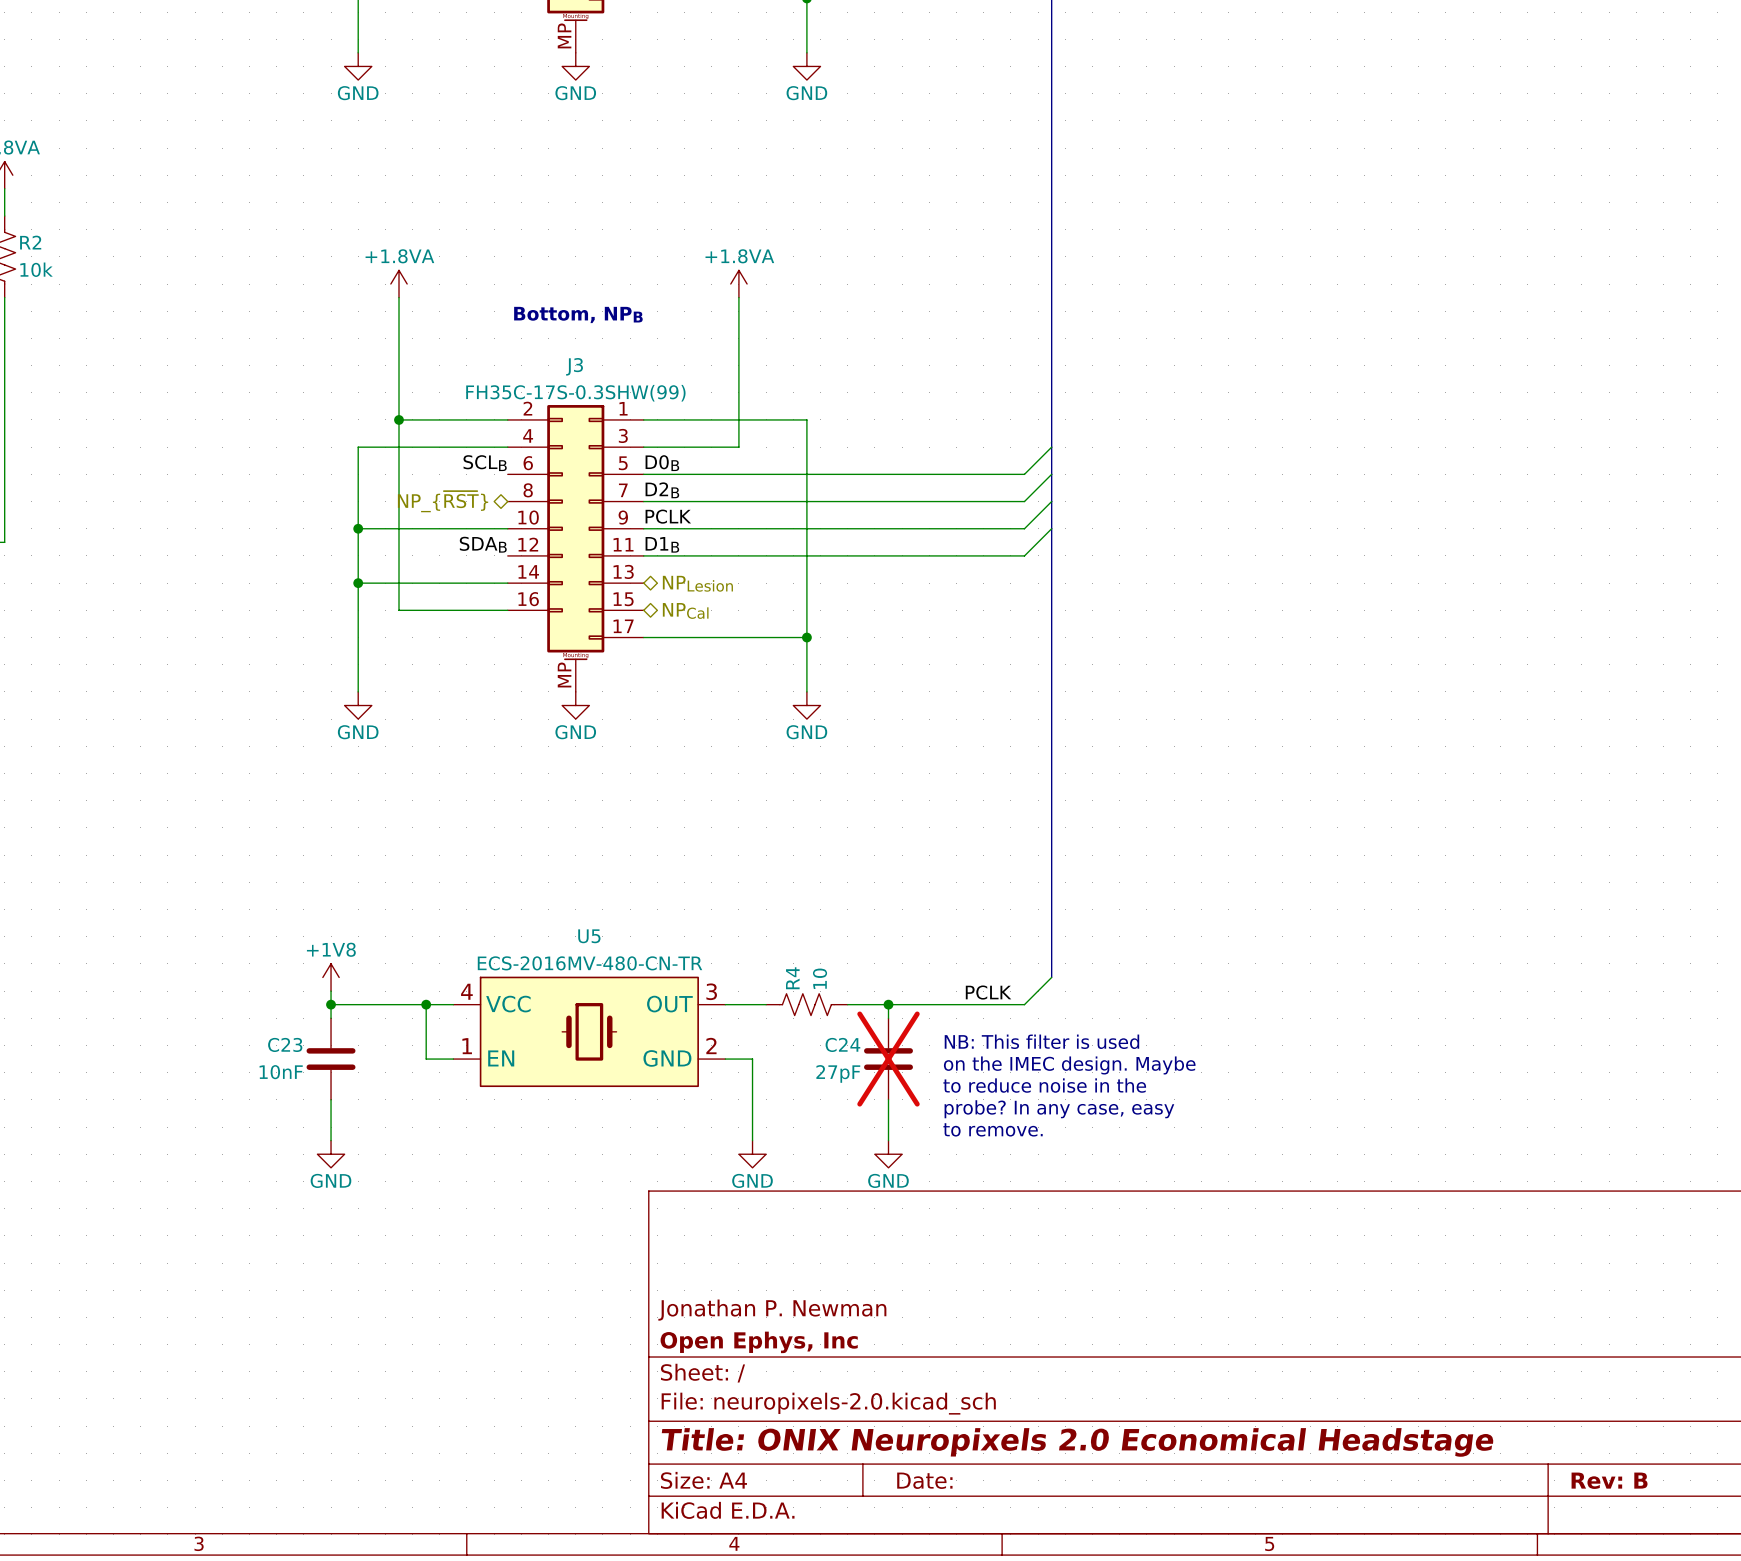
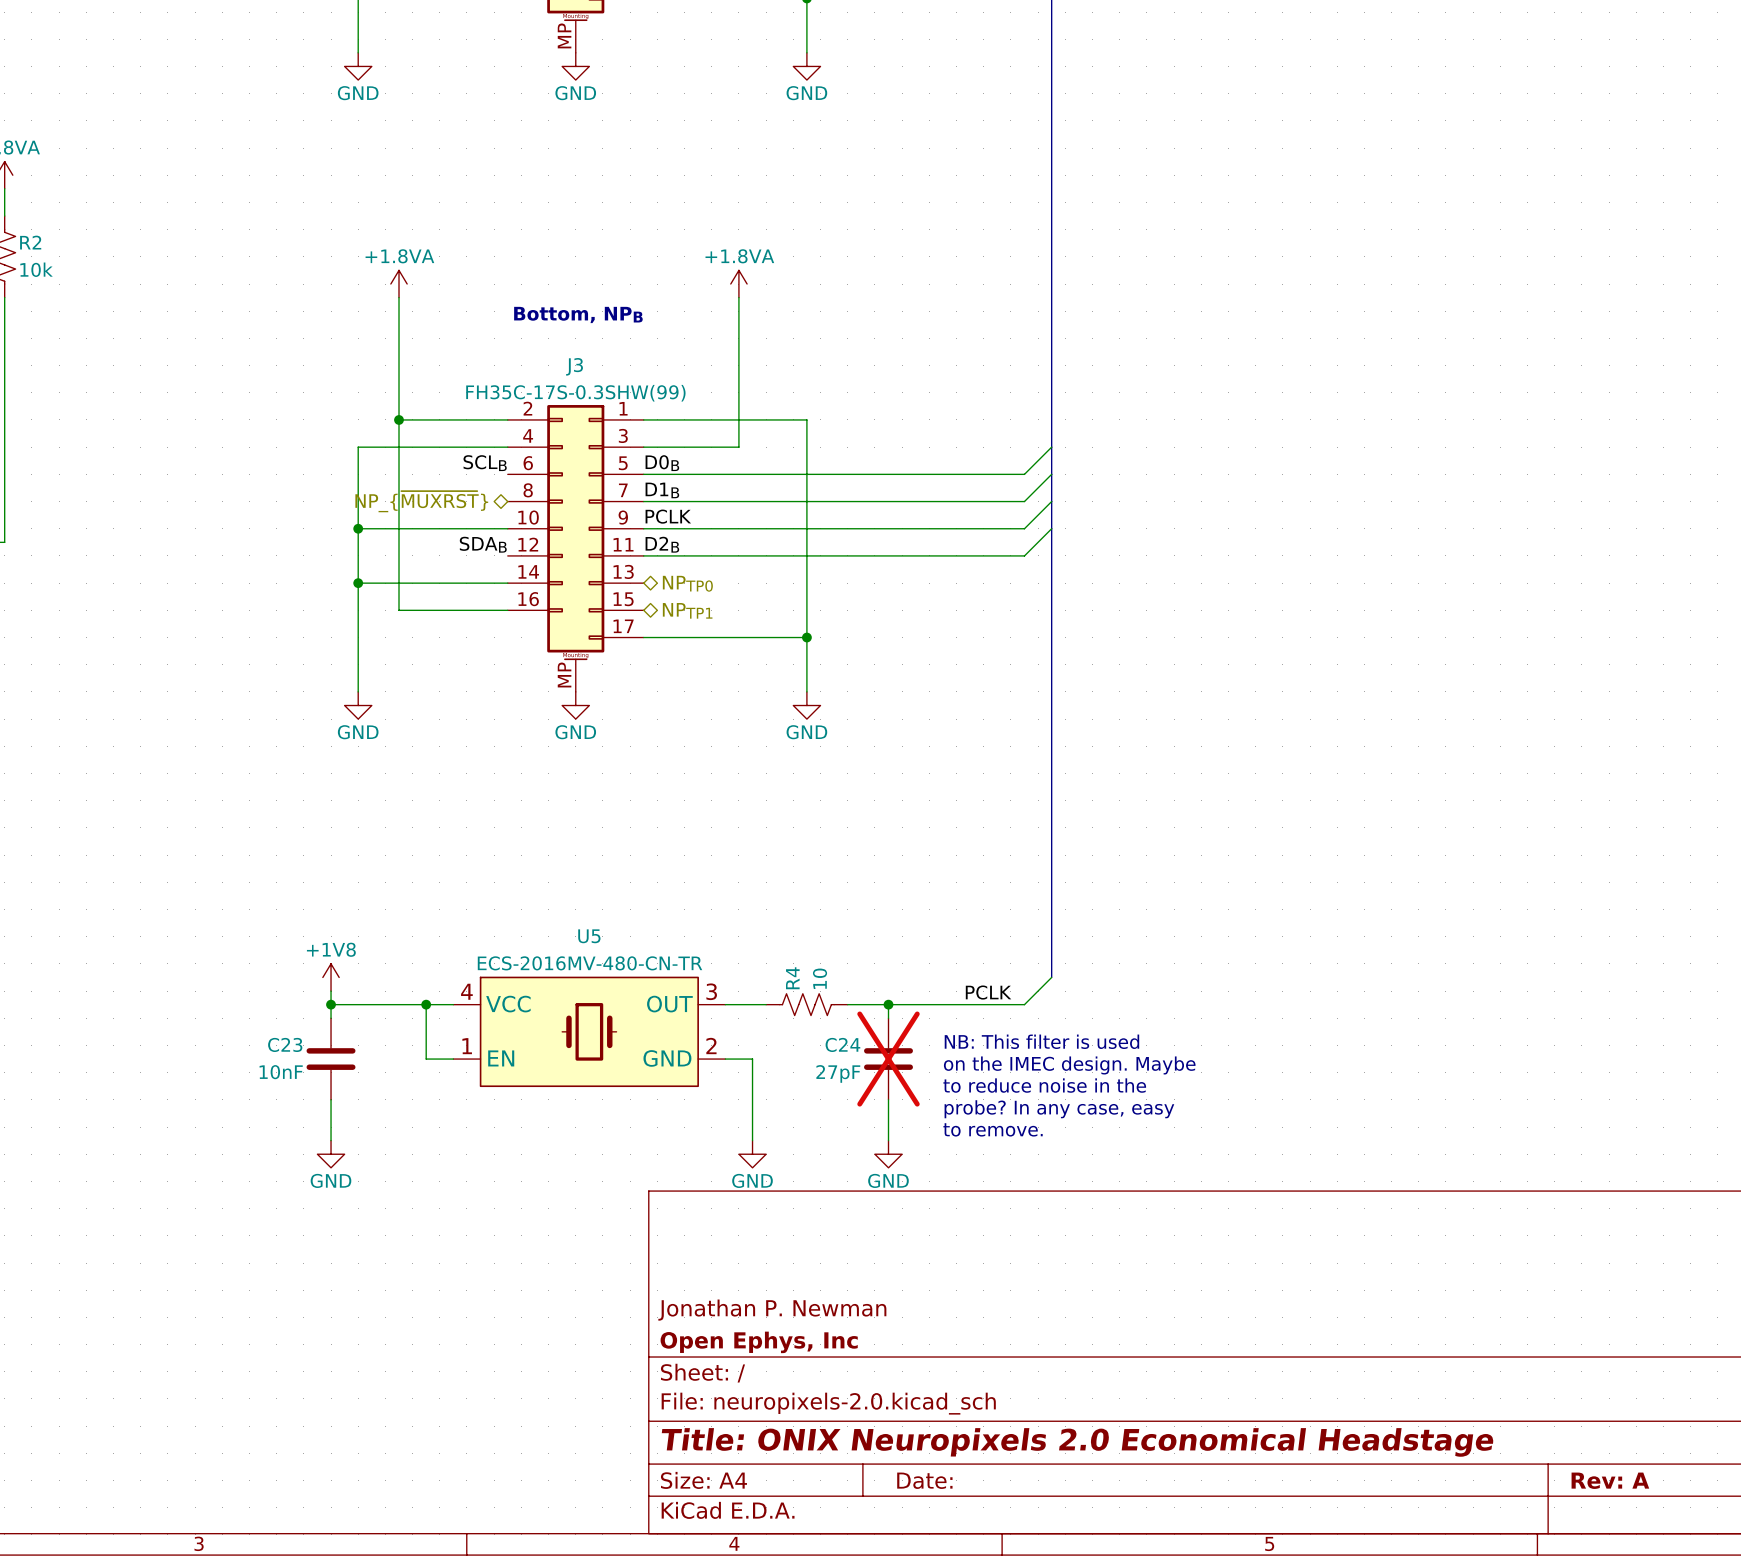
label: D2B (662, 490) -> D1B (662, 490)
hierarchical label: NP_{~{RST}} (443, 501) -> NP_{~{MUXRST}} (421, 501)
label: D1B (662, 544) -> D2B (662, 544)
hierarchical label: NPLesion (697, 583) -> NPTP0 (687, 583)
hierarchical label: NPCal (685, 610) -> NPTP1 (687, 610)
title block: Rev: B (1609, 1480) -> Rev: A (1610, 1480)

